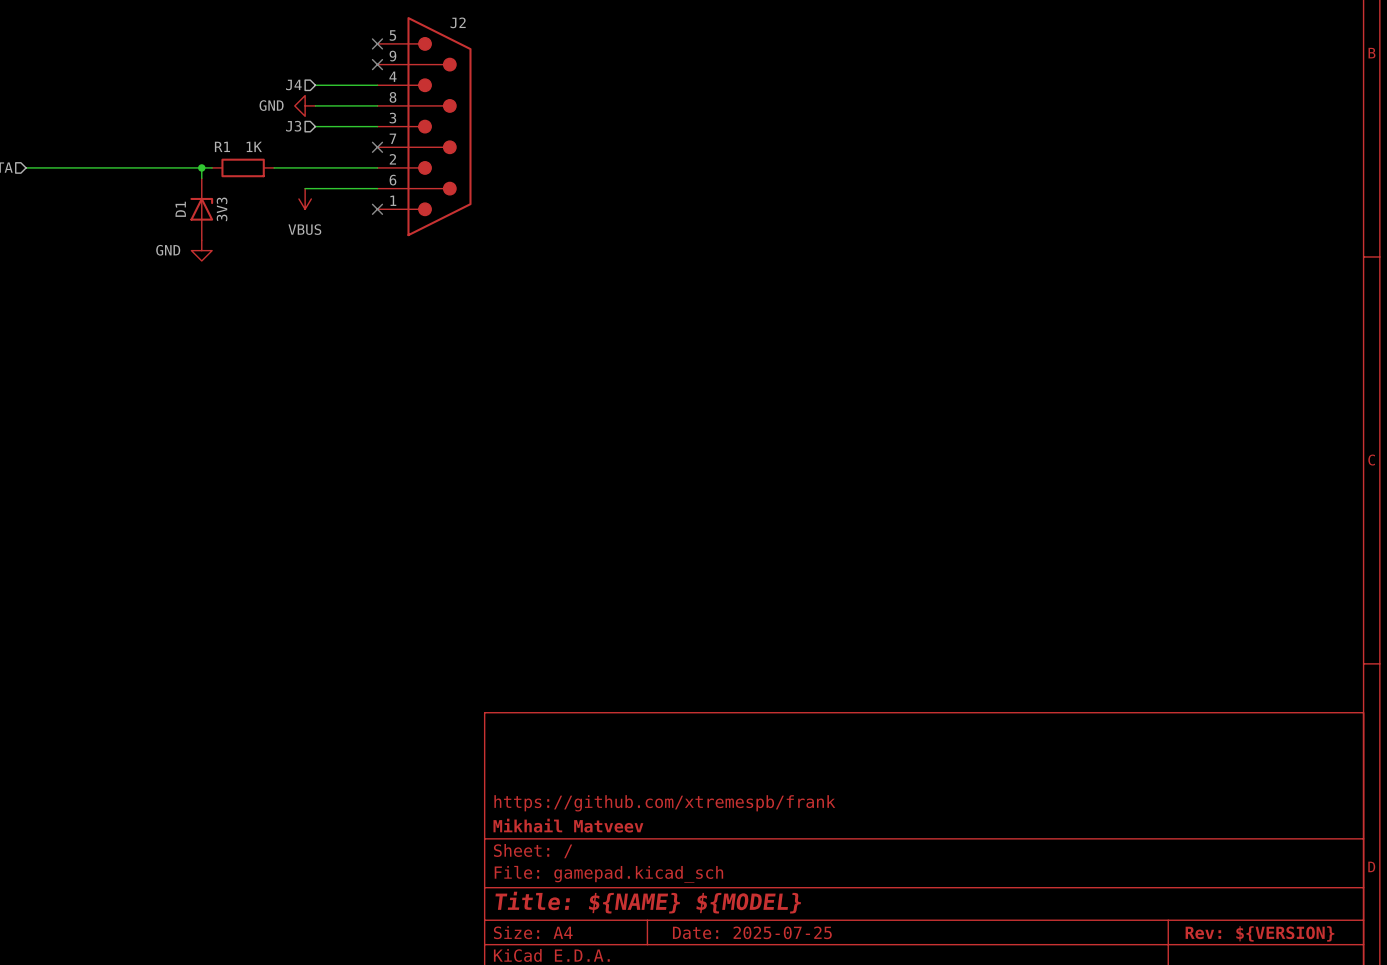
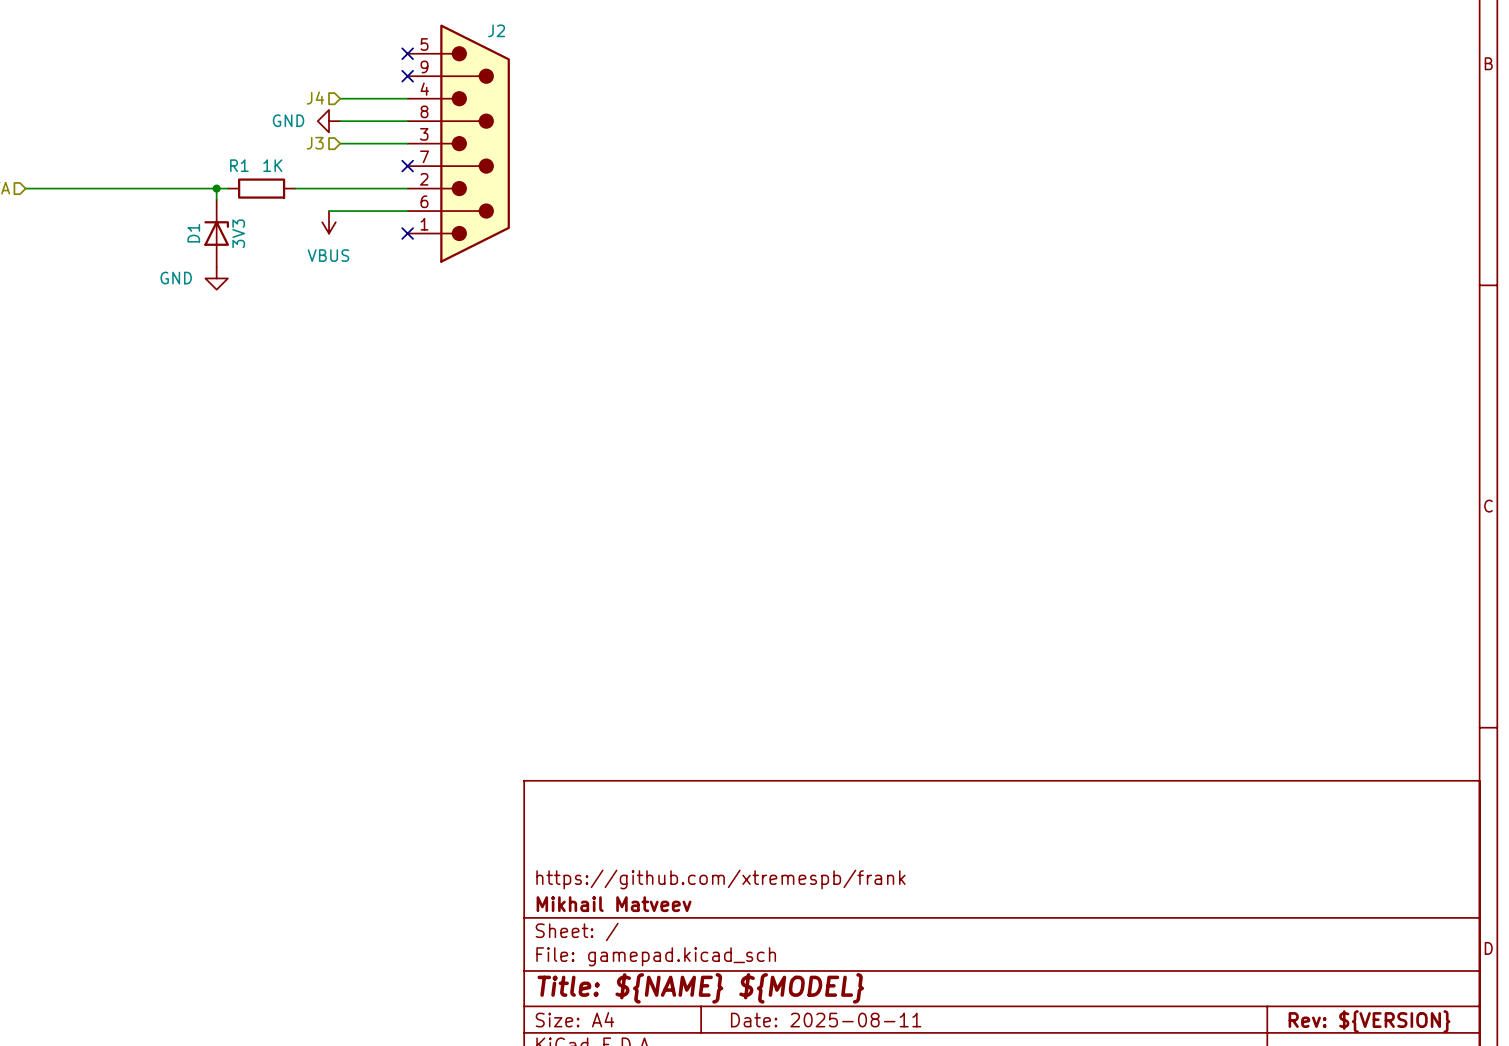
title block: Date: 2025-07-25 (752, 932) -> Date: 2025-08-11 (826, 1020)

